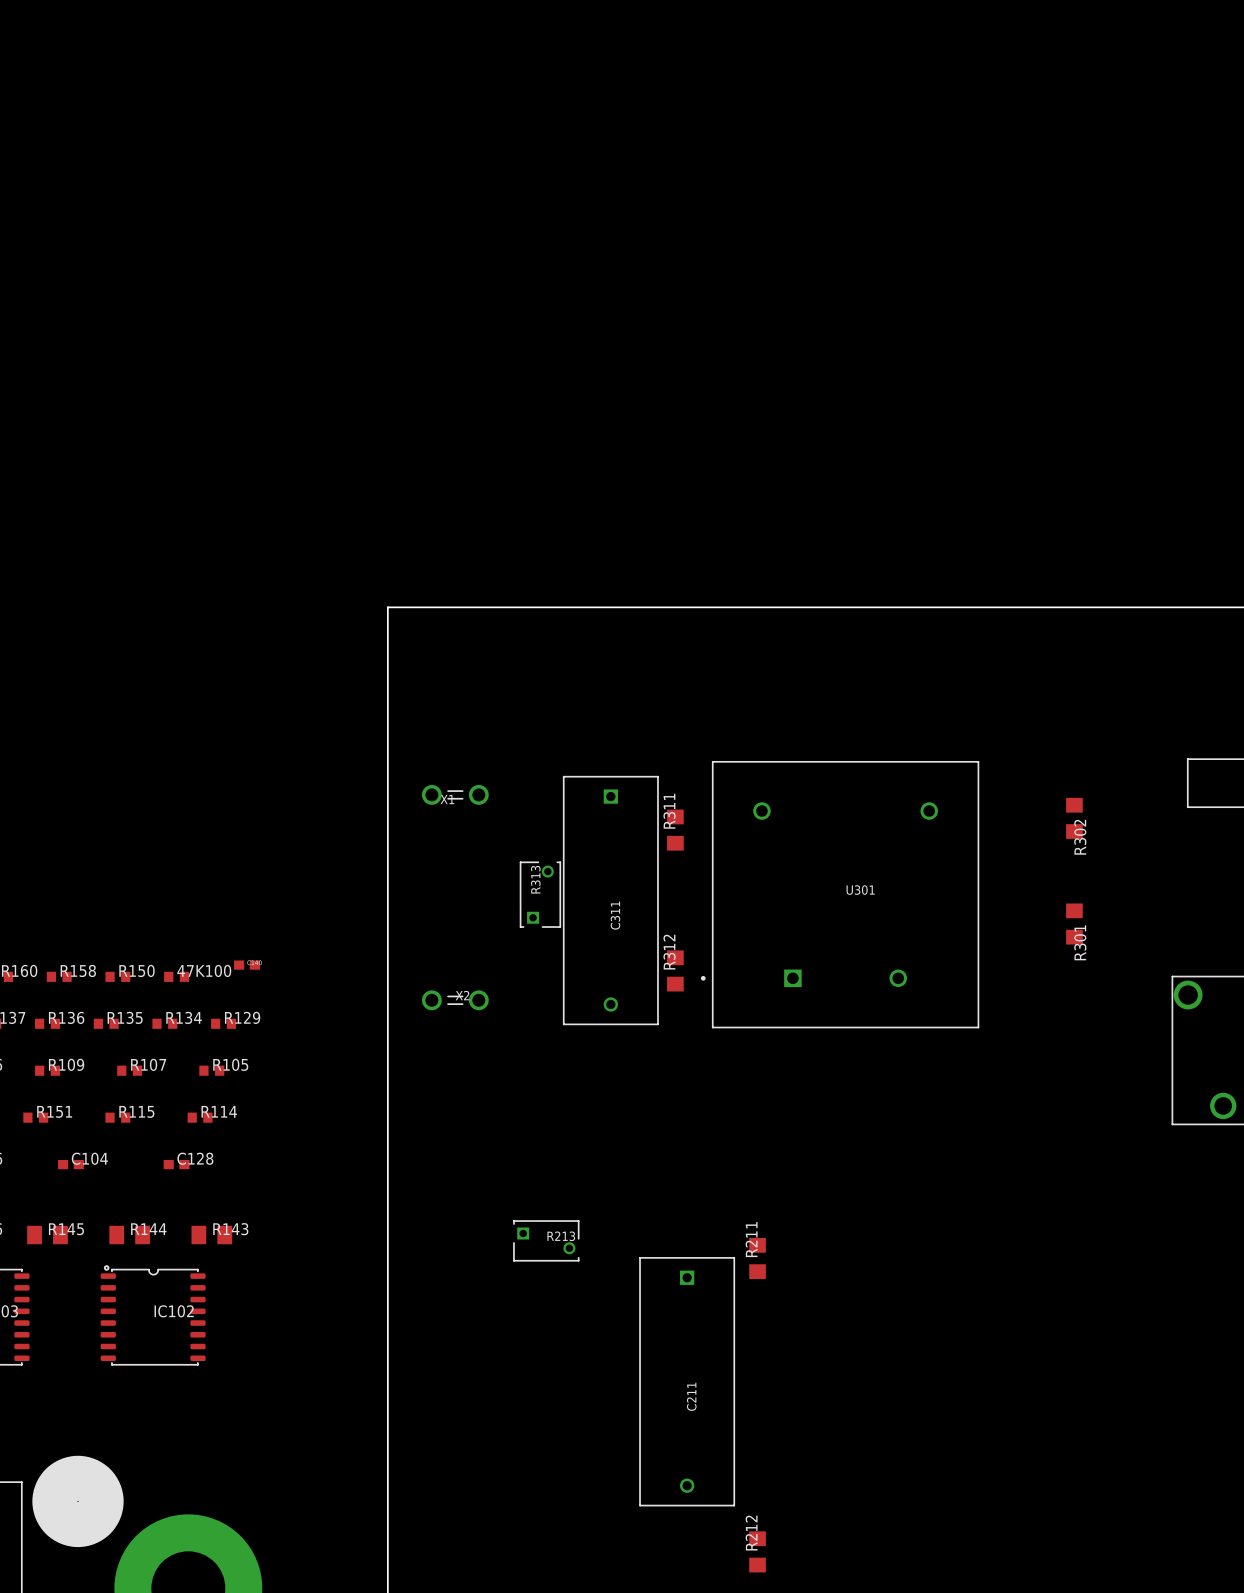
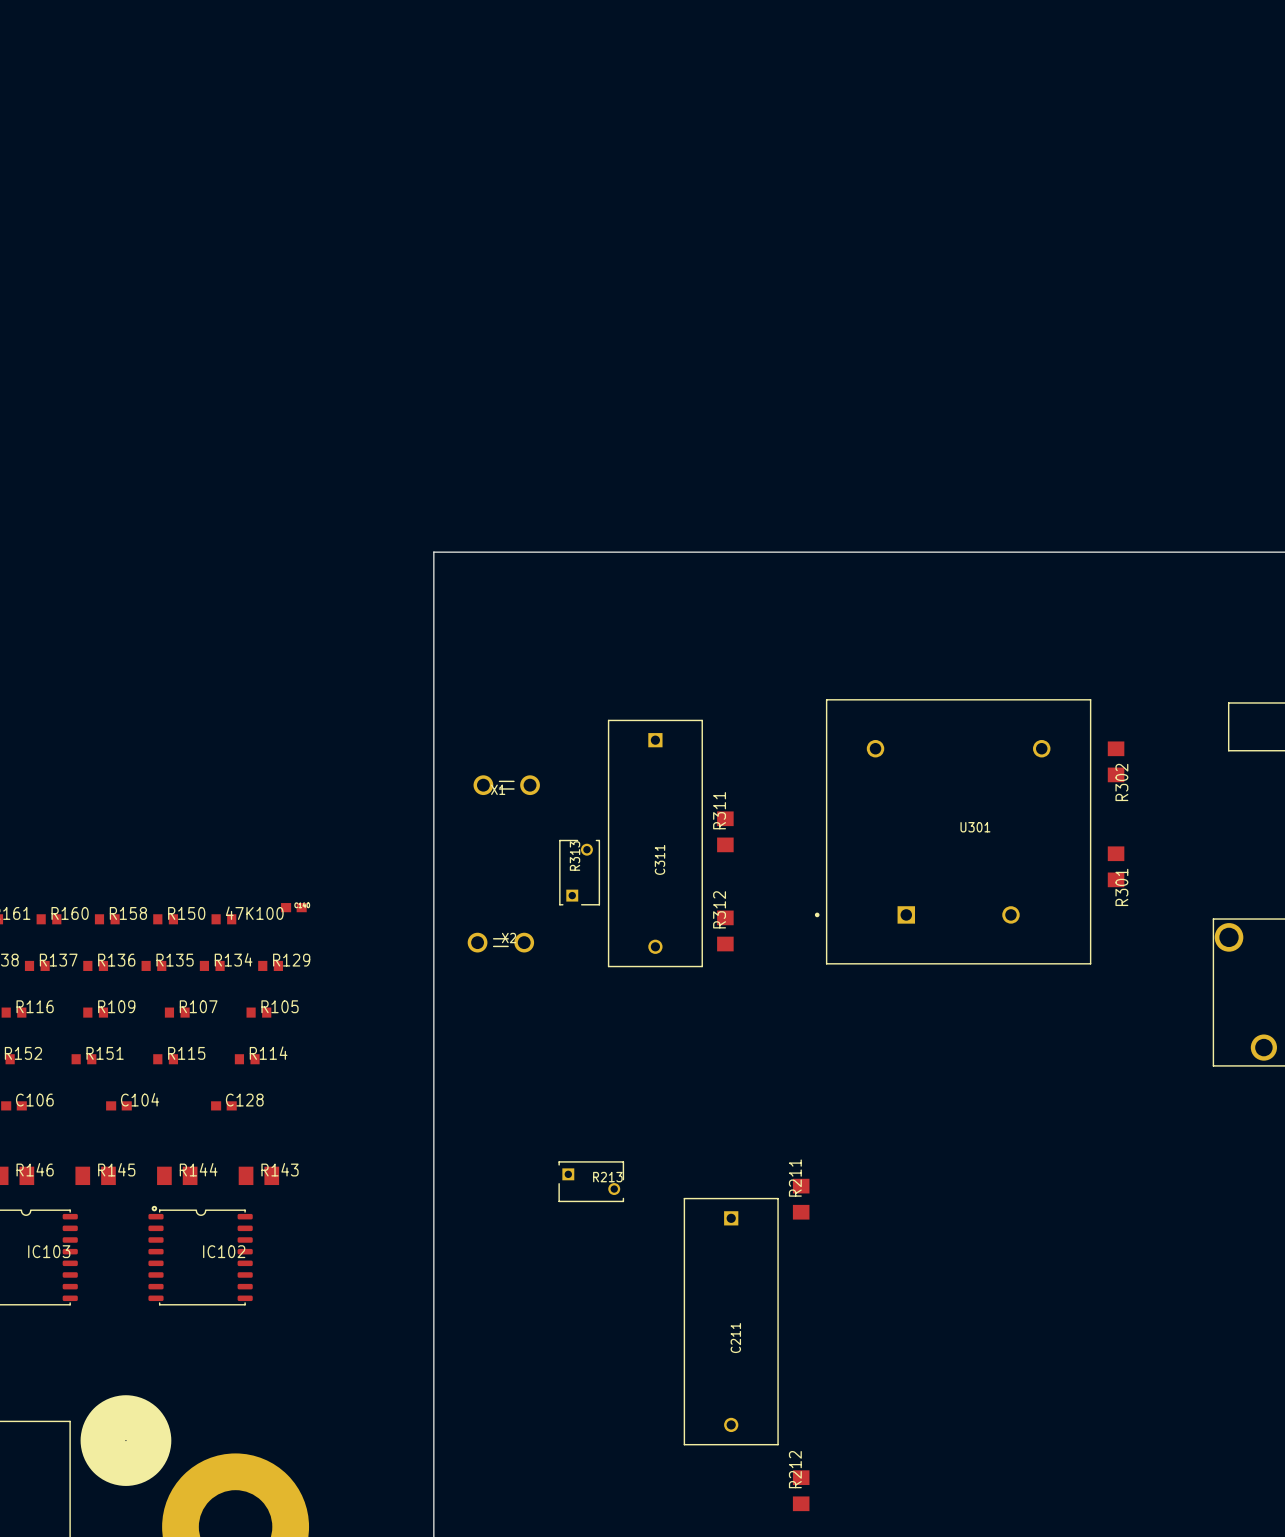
X1 position: (455, 794) -> (506, 785)
R311 position: (675, 830) -> (725, 831)
R313 position: (540, 894) -> (579, 872)
U301 position: (840, 894) -> (953, 831)
R312 position: (675, 970) -> (725, 930)

